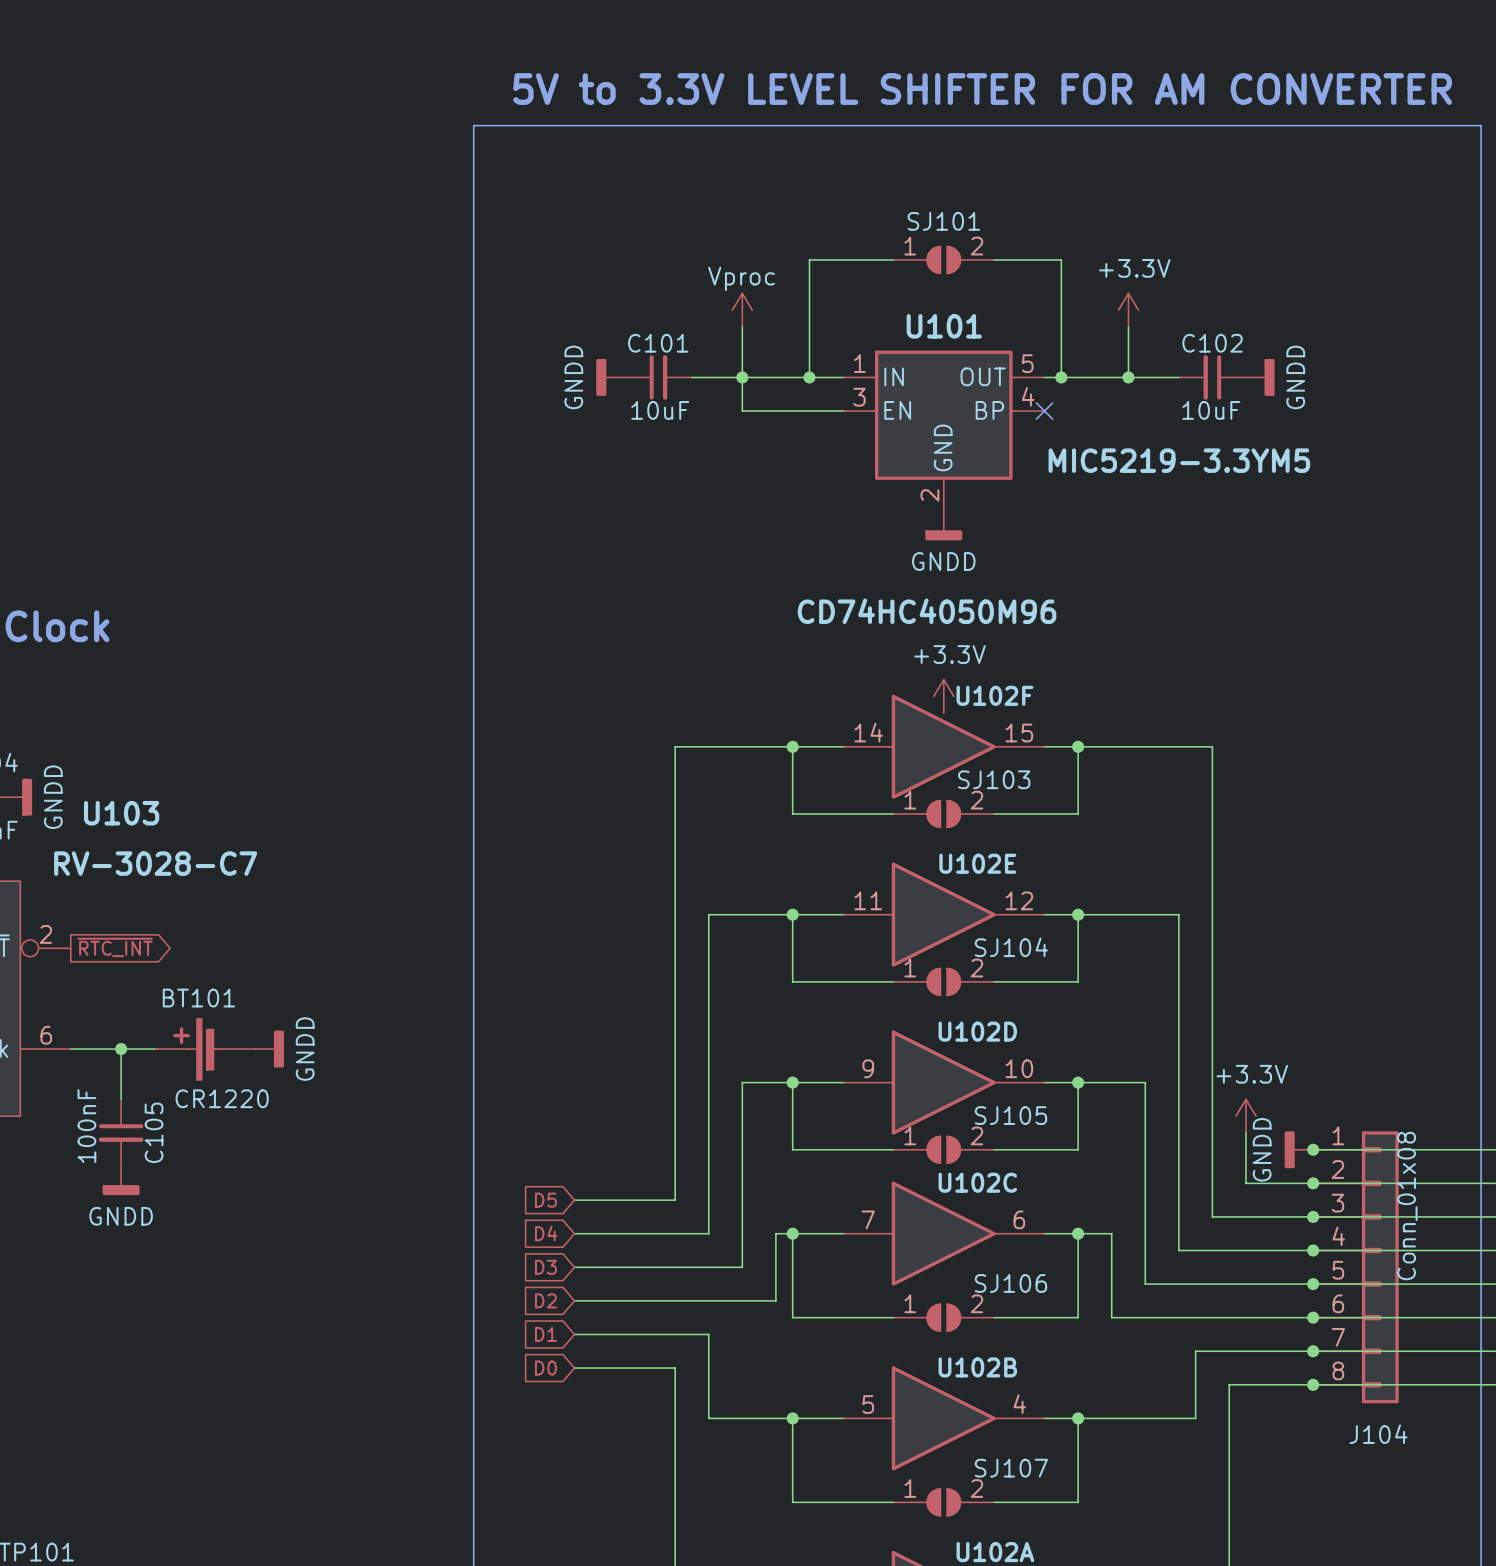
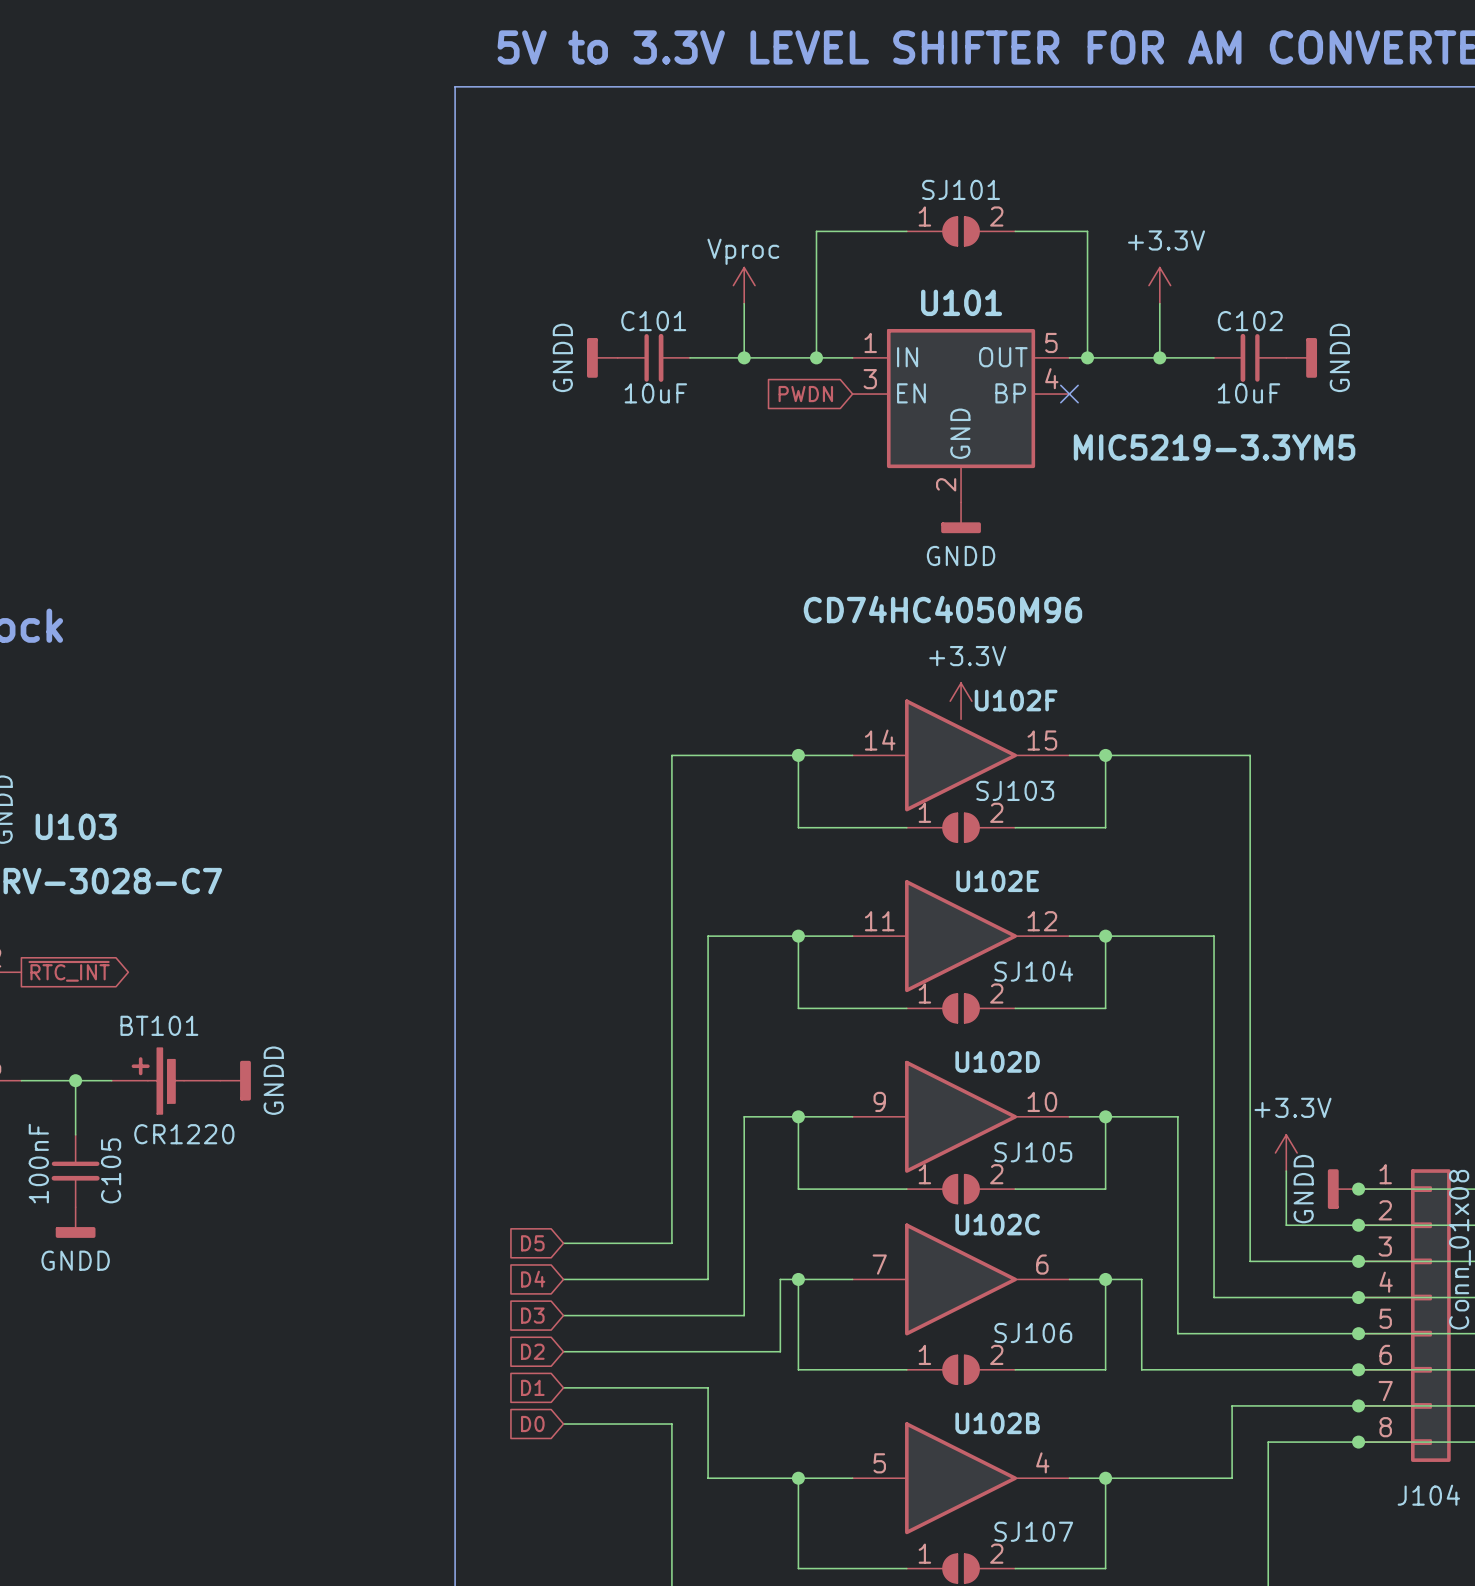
wire: (742, 377) (742, 411) (843, 411) -> none
global label: none -> PWDN (805, 394)

